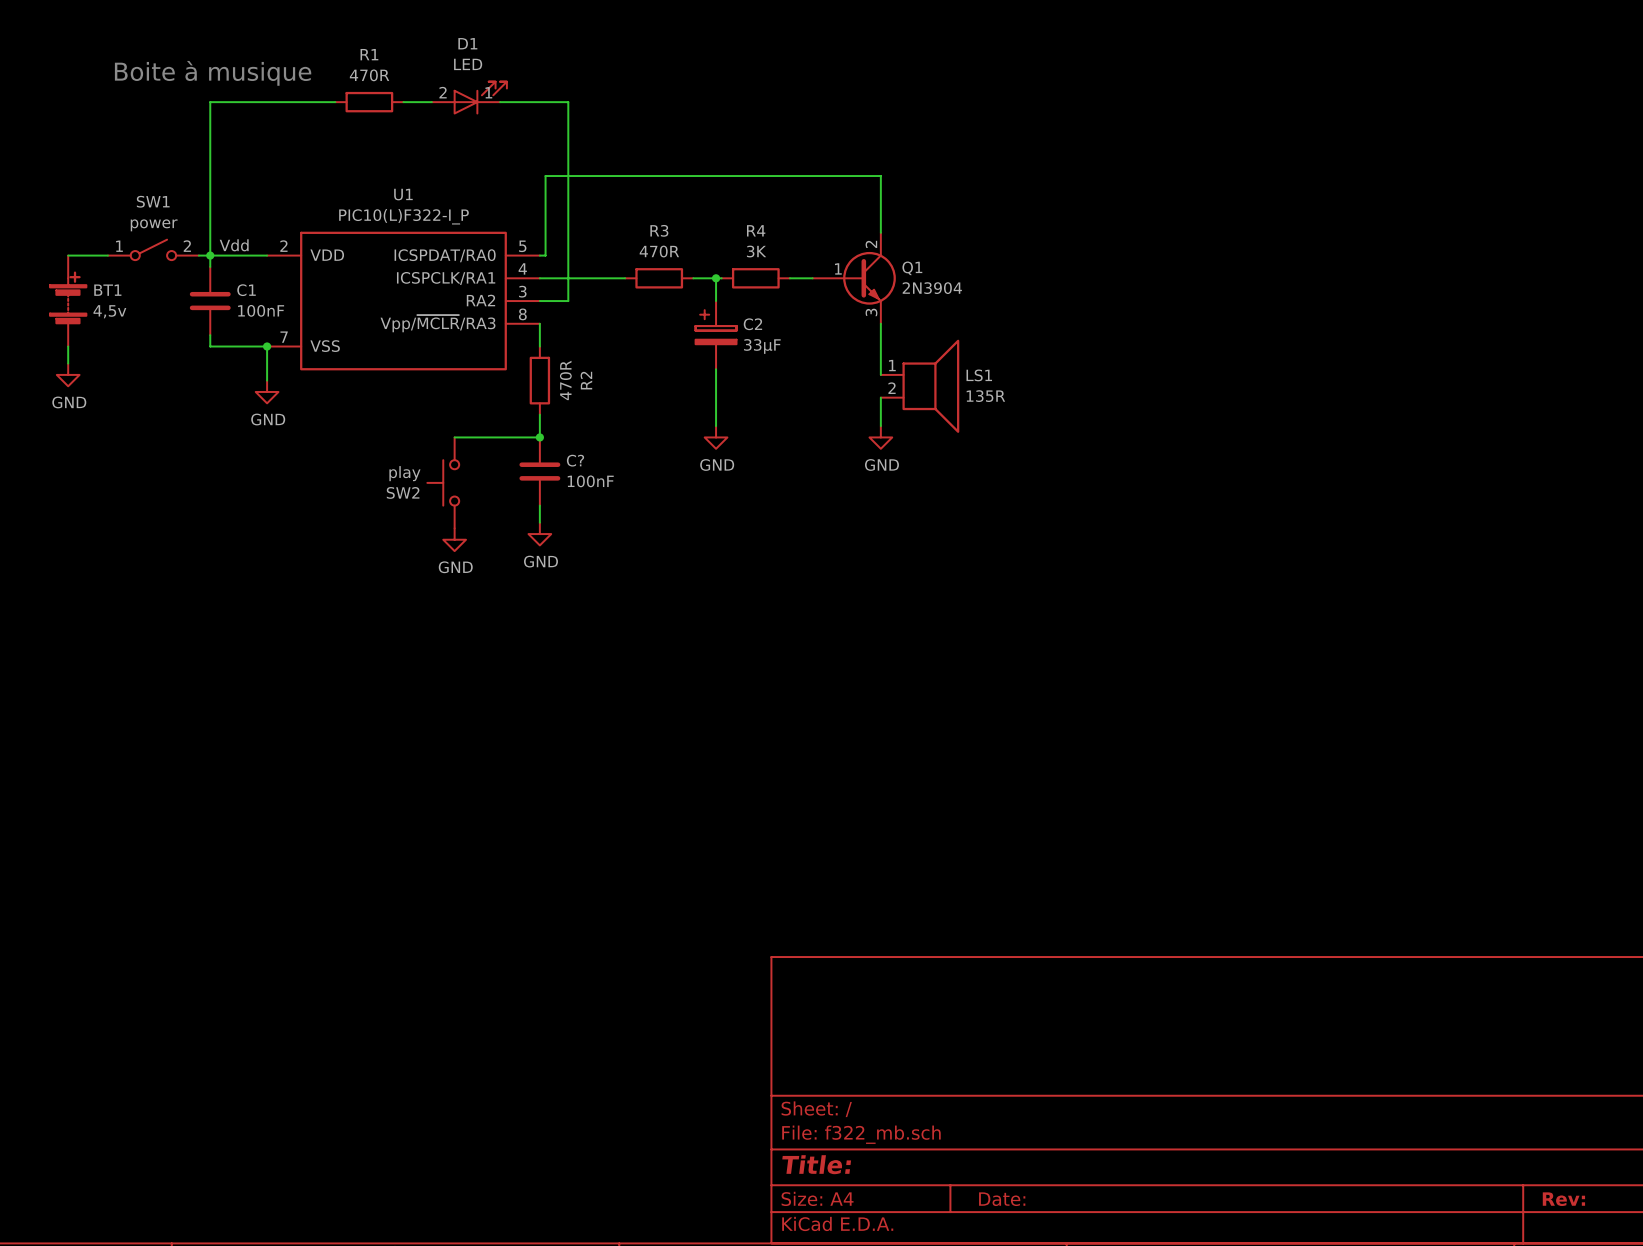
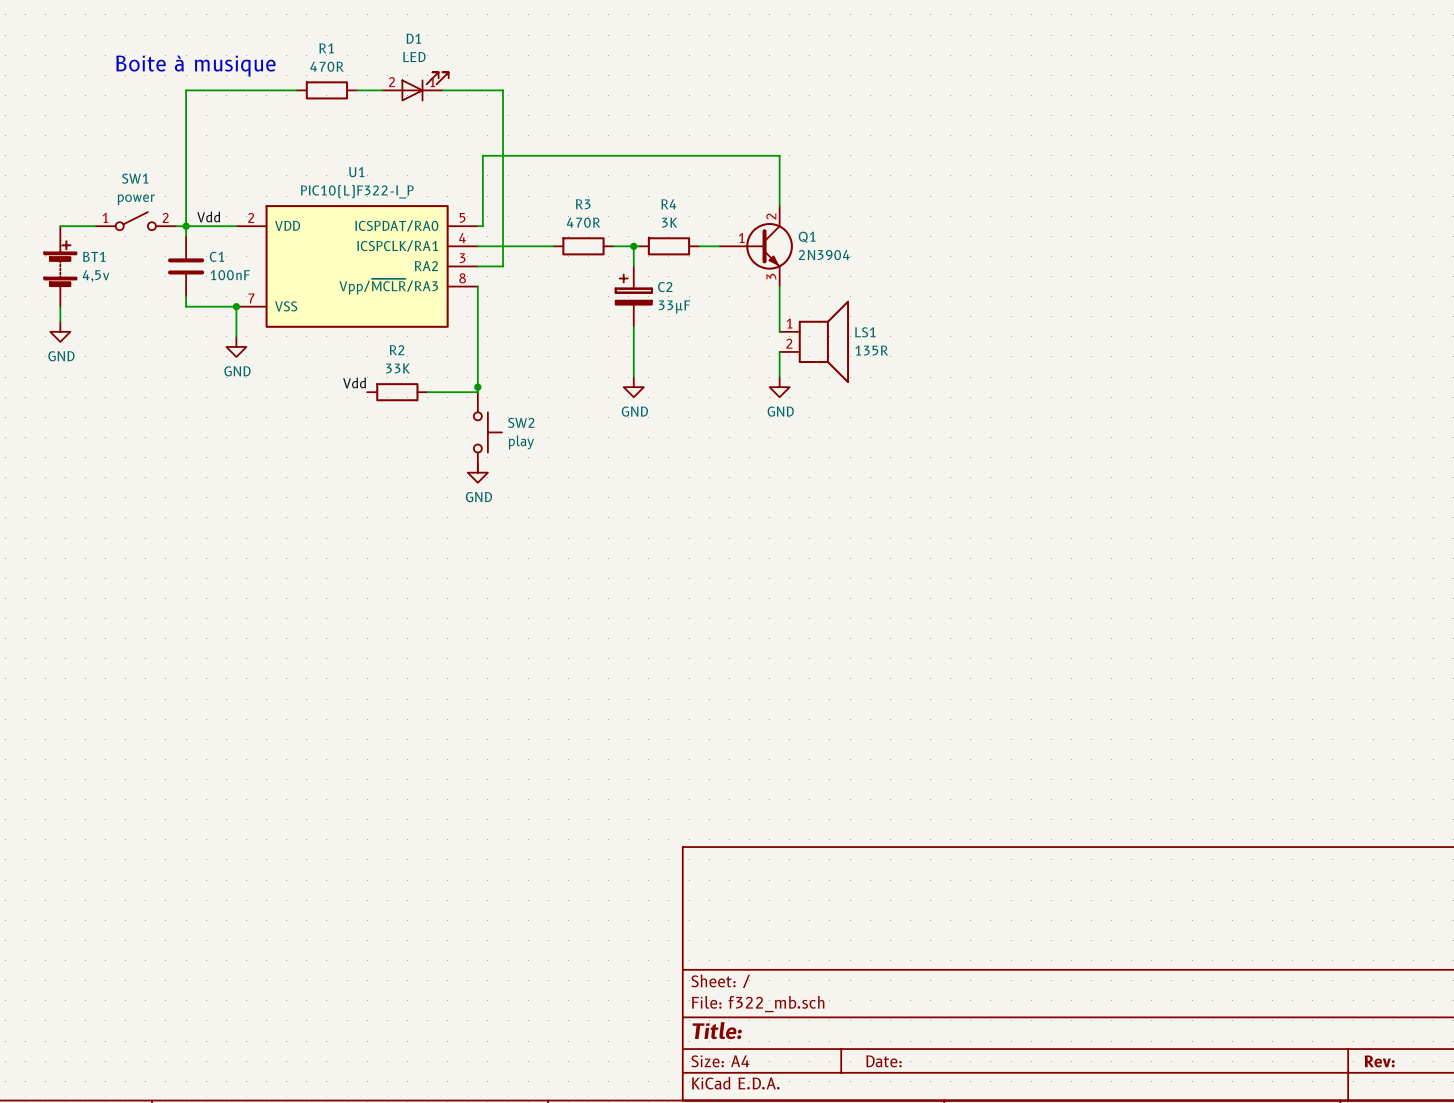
wire: none -> (477, 306) (477, 367)
R2 rotation: 0° (539, 380) -> 90° clockwise (397, 392)
R2 position: (539, 380) -> (397, 392)
R2 value: 470R (565, 380) -> 33K (397, 368)
R2 name position: R2 (586, 380) -> R2 (397, 350)
label: none -> Vdd (354, 382)
wire: (454, 437) (539, 437) -> (427, 392) (477, 392) (477, 387)
C?: 100nF (539, 471) -> none
SW2 rotation: 0° (443, 482) -> 180° (487, 432)
SW2 position: (443, 482) -> (487, 432)
power symbol: GND (454, 539) -> none

